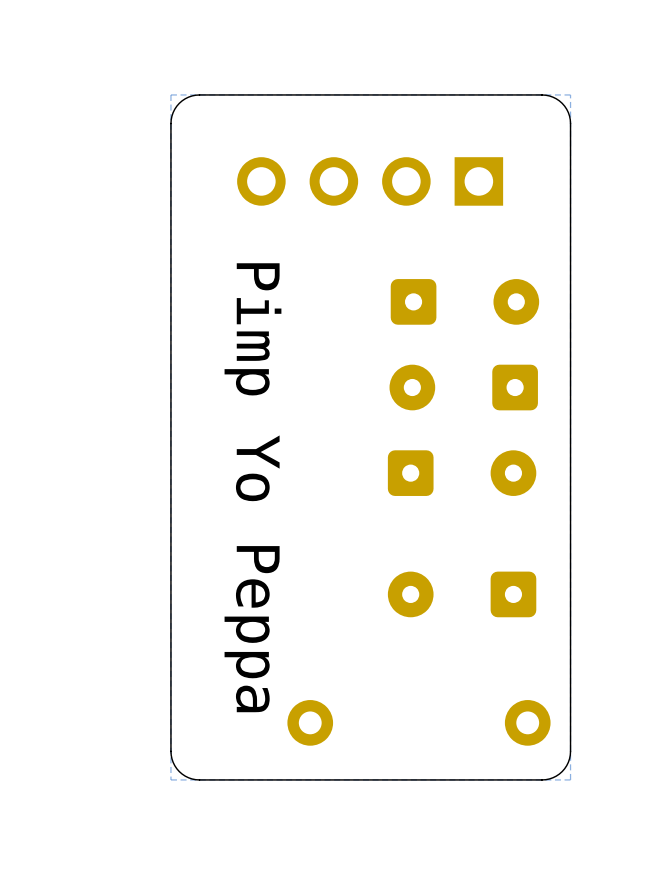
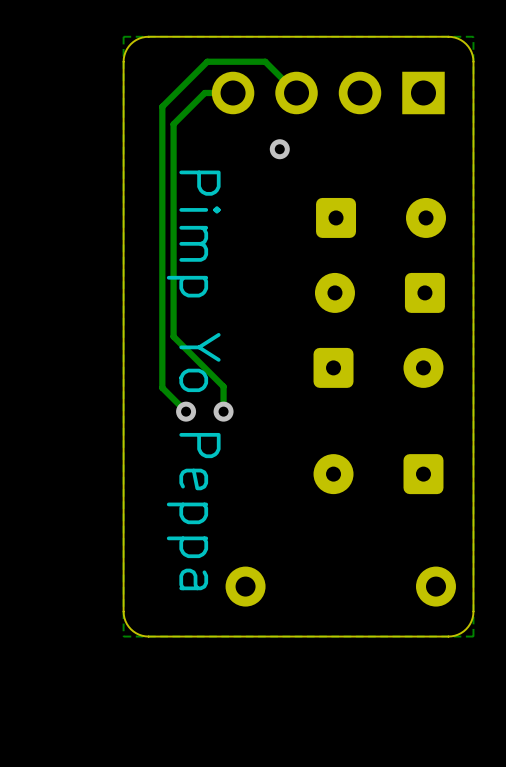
track: none -> (233, 92) (204, 92) (173, 124) (173, 336) (223, 386) (223, 411)
track: none -> (296, 92) (265, 61) (207, 61) (162, 106) (162, 387) (186, 411)
part position: (370, 181) -> (328, 92)
via: none -> (279, 149)
via: none -> (186, 411)
via: none -> (223, 411)

